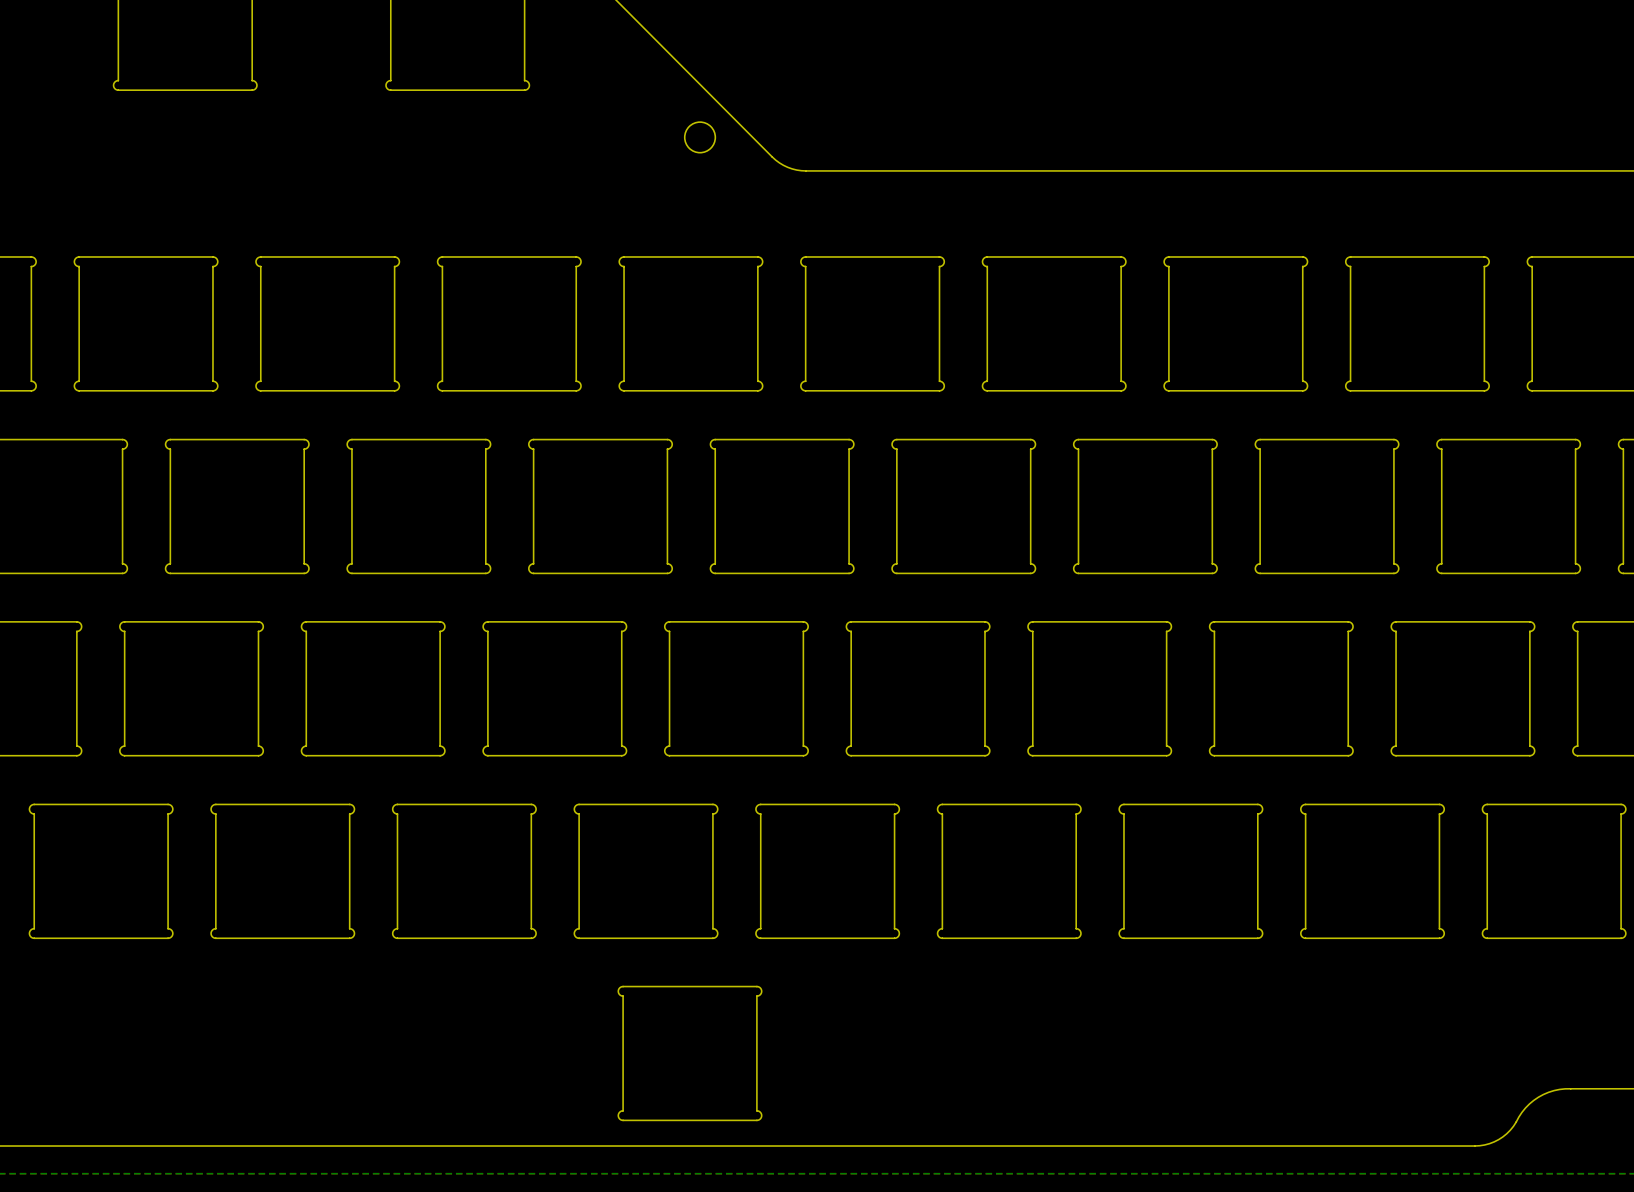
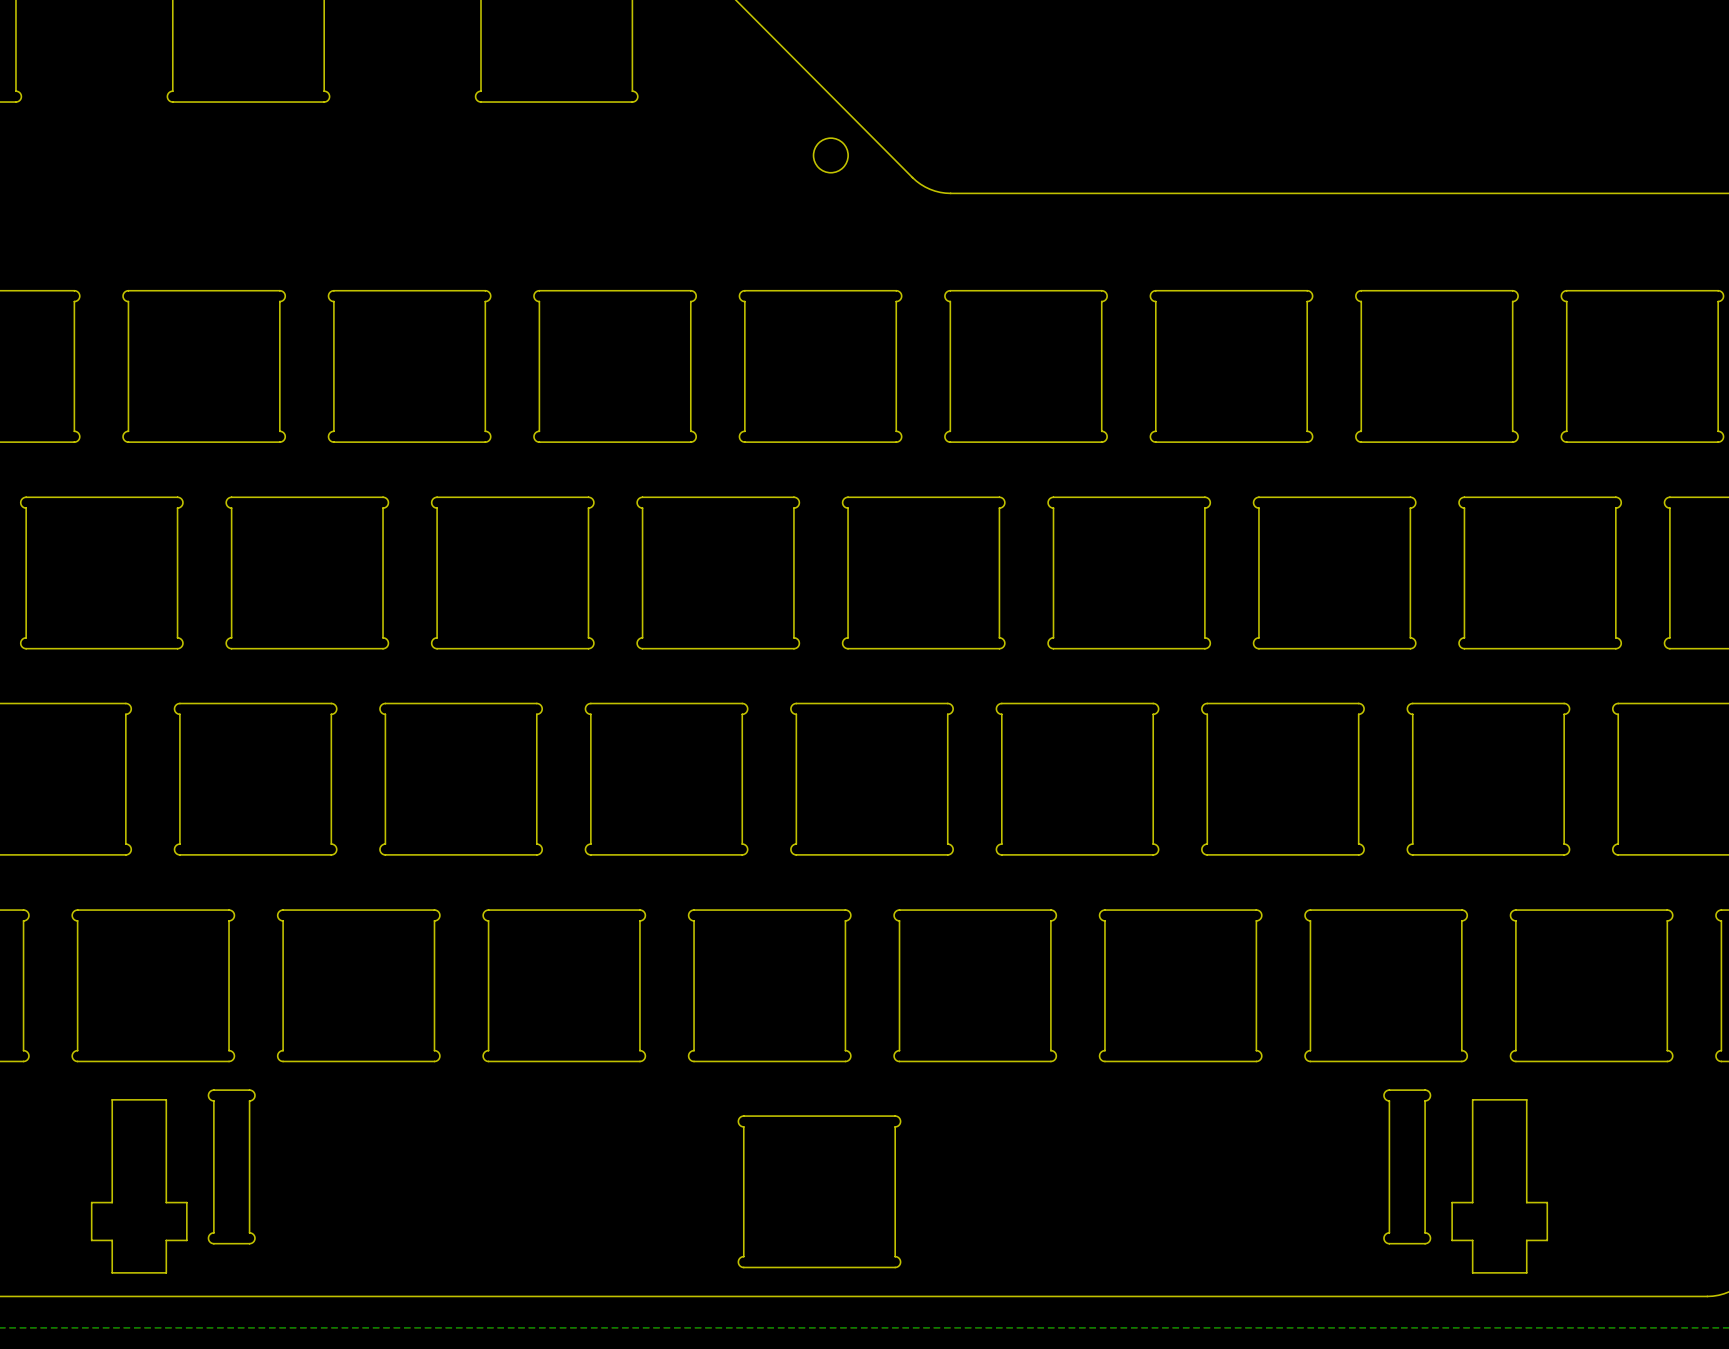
drawing shape: [617, 985, 763, 1121] -> [91, 1089, 1548, 1274]

